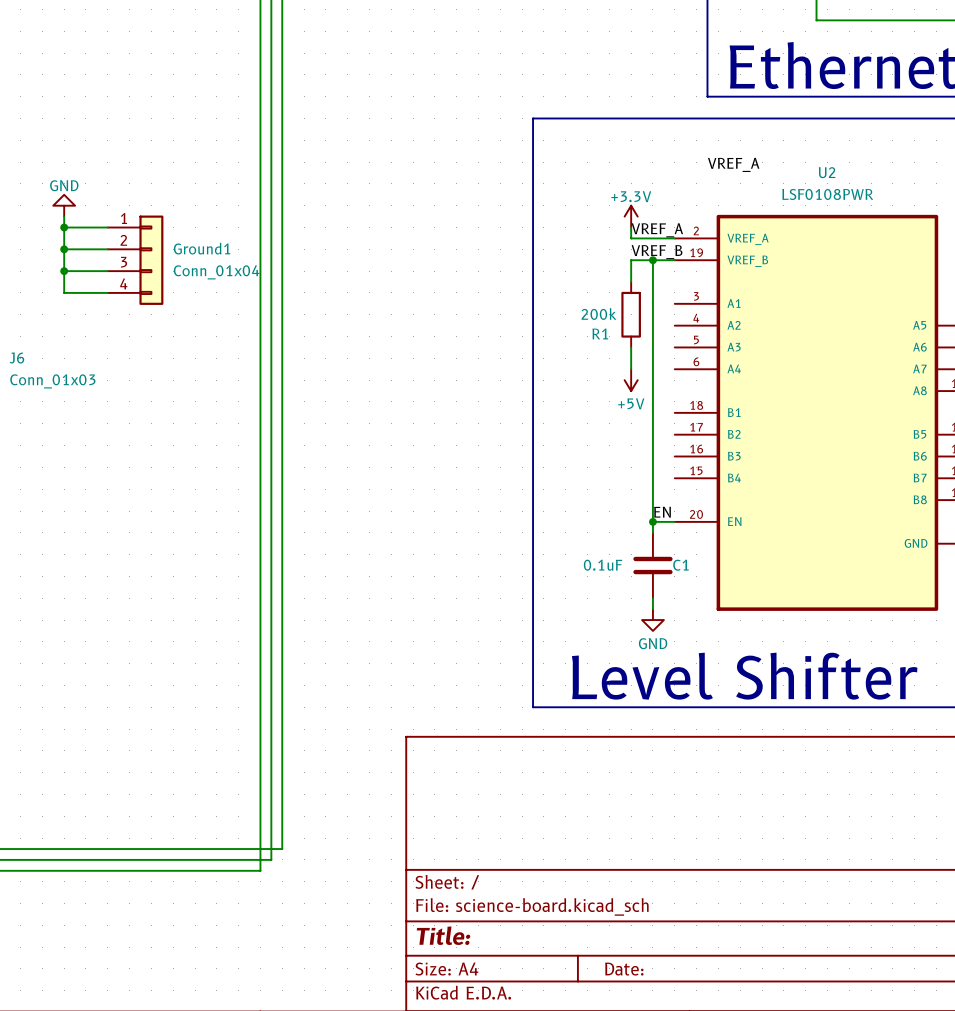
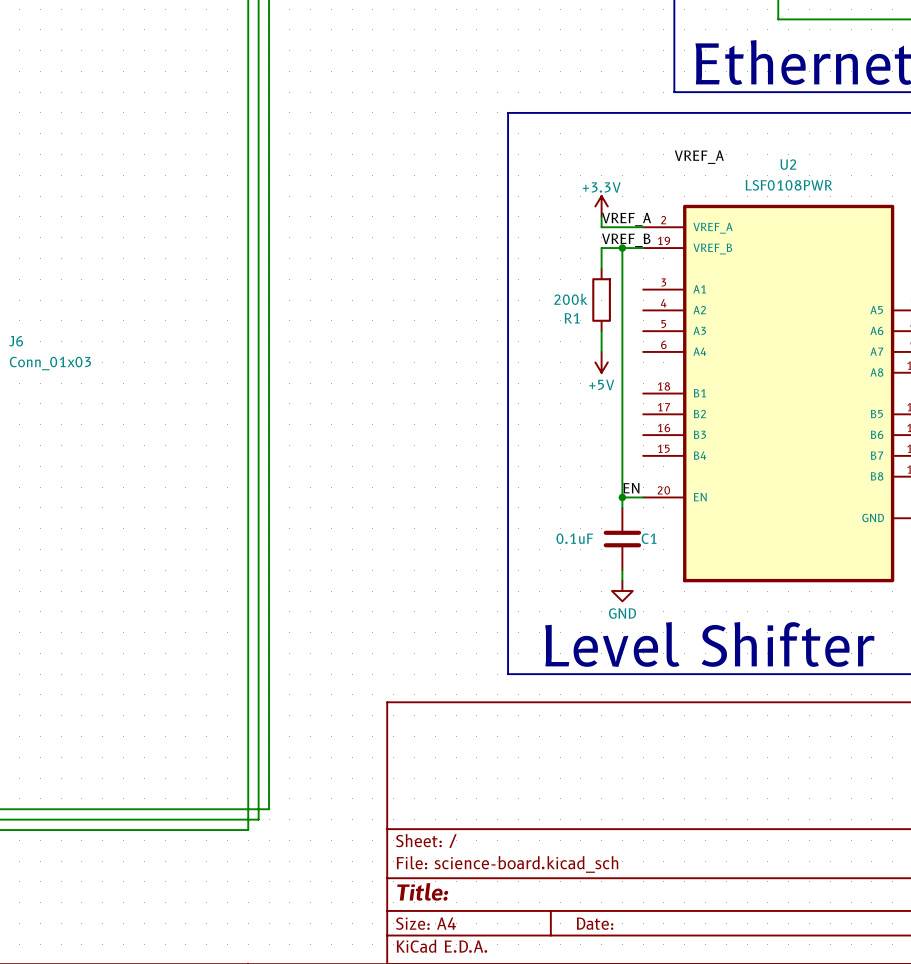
power symbol: GND (64, 205) -> none
wire: (64, 216) (64, 292) (107, 292) -> none
wire: (64, 227) (107, 227) -> none
junction: (64, 227) -> none
wire: (64, 249) (107, 249) -> none
junction: (64, 249) -> none
Ground1: Conn_01x04 (135, 260) -> none
wire: (64, 271) (107, 271) -> none
junction: (64, 271) -> none

